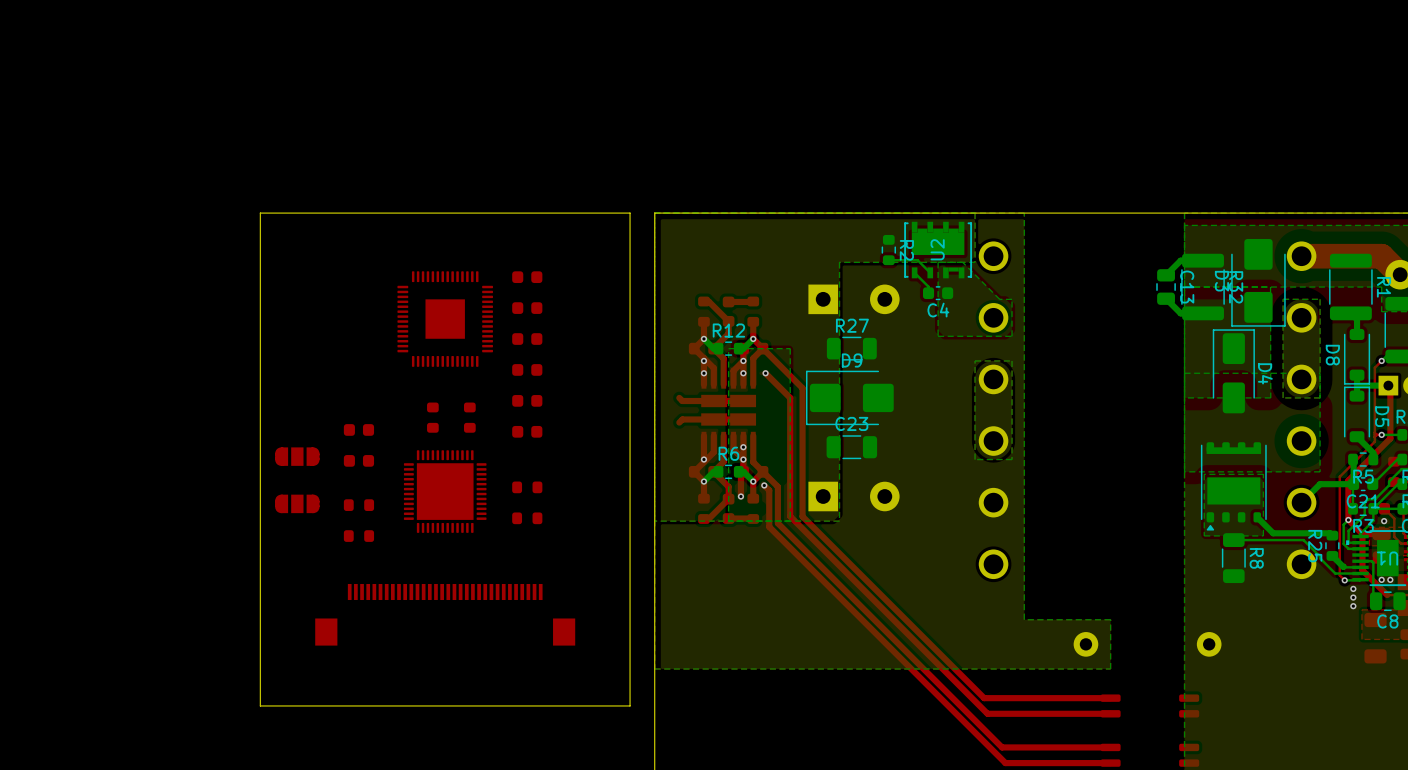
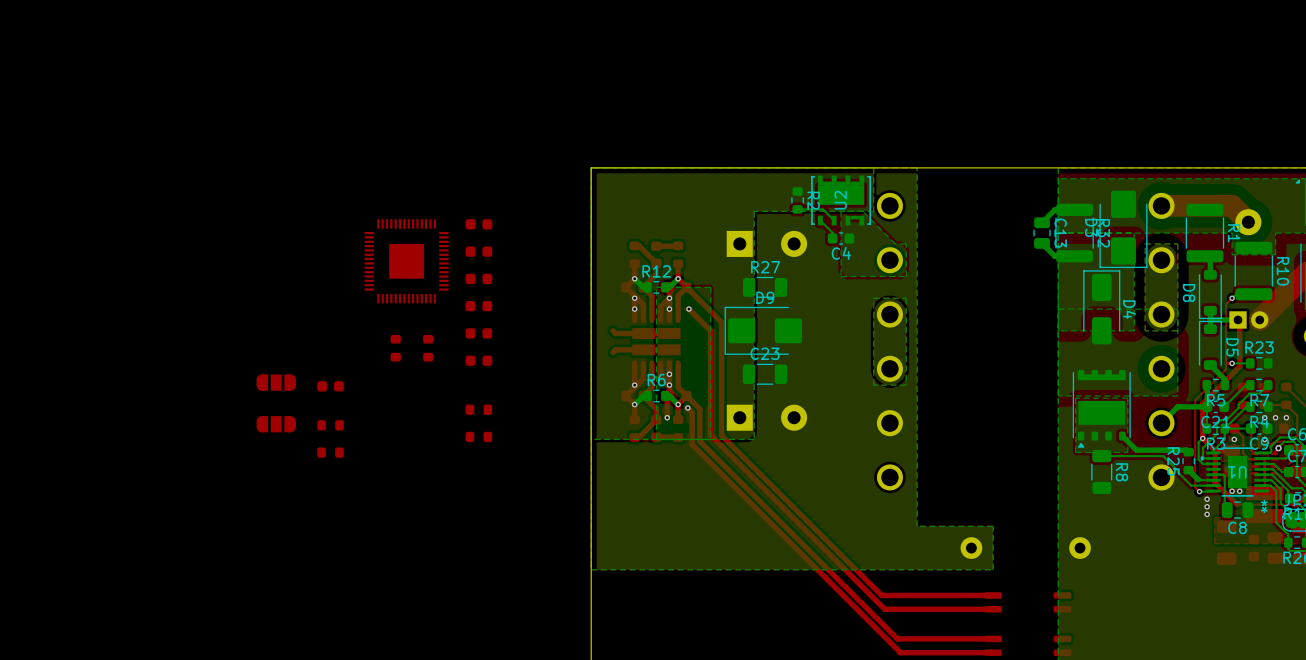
board edge: (630, 213) (260, 213) (260, 705) (630, 705) (630, 213) -> none
part: (358, 429) -> none
part: (445, 491) -> none
part: (445, 614) -> none

